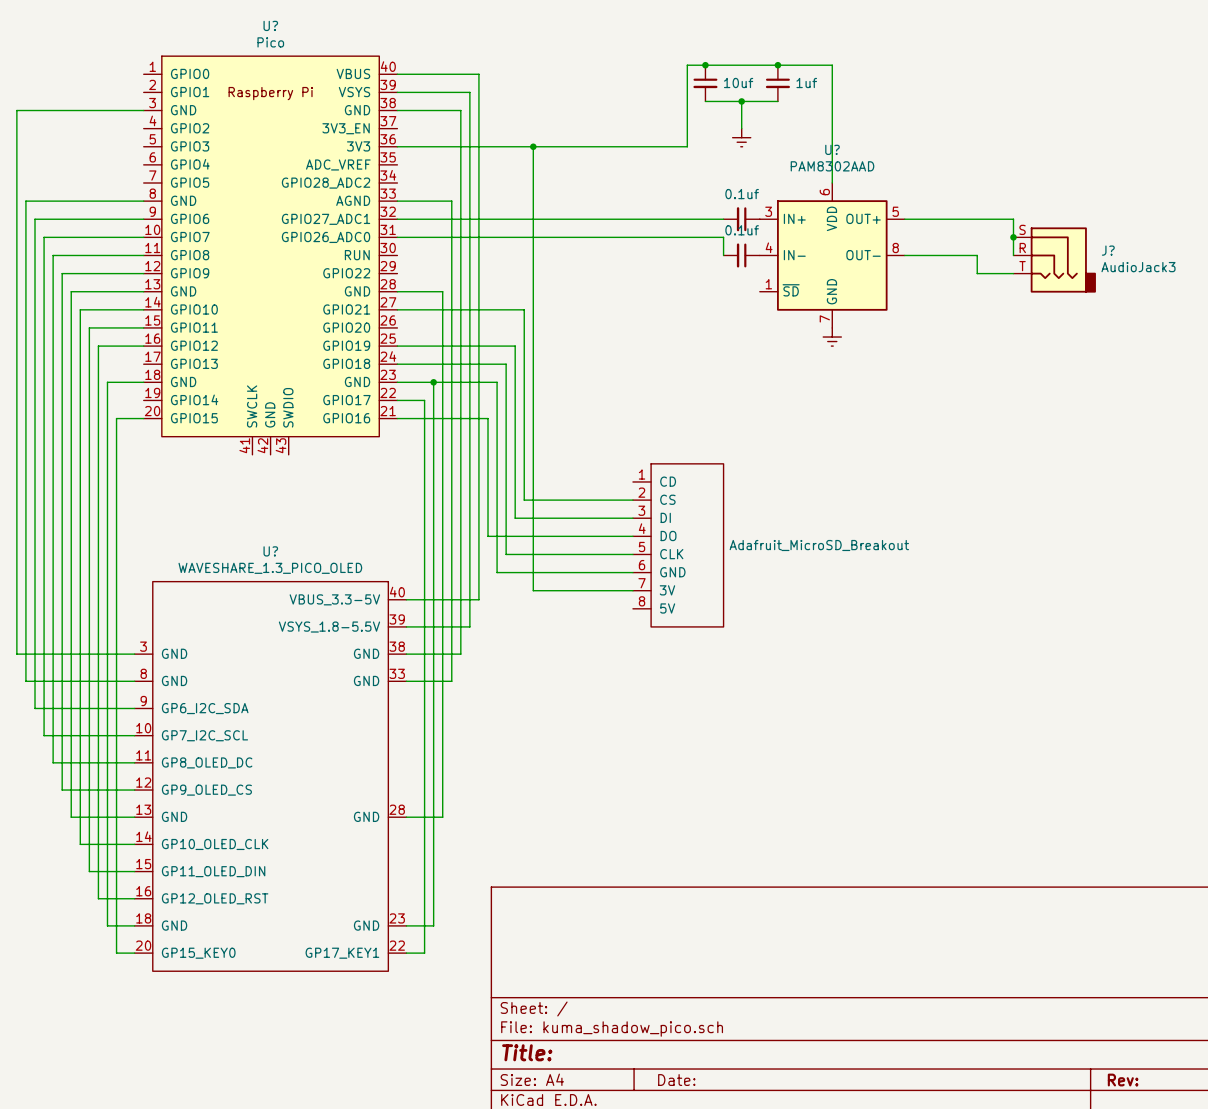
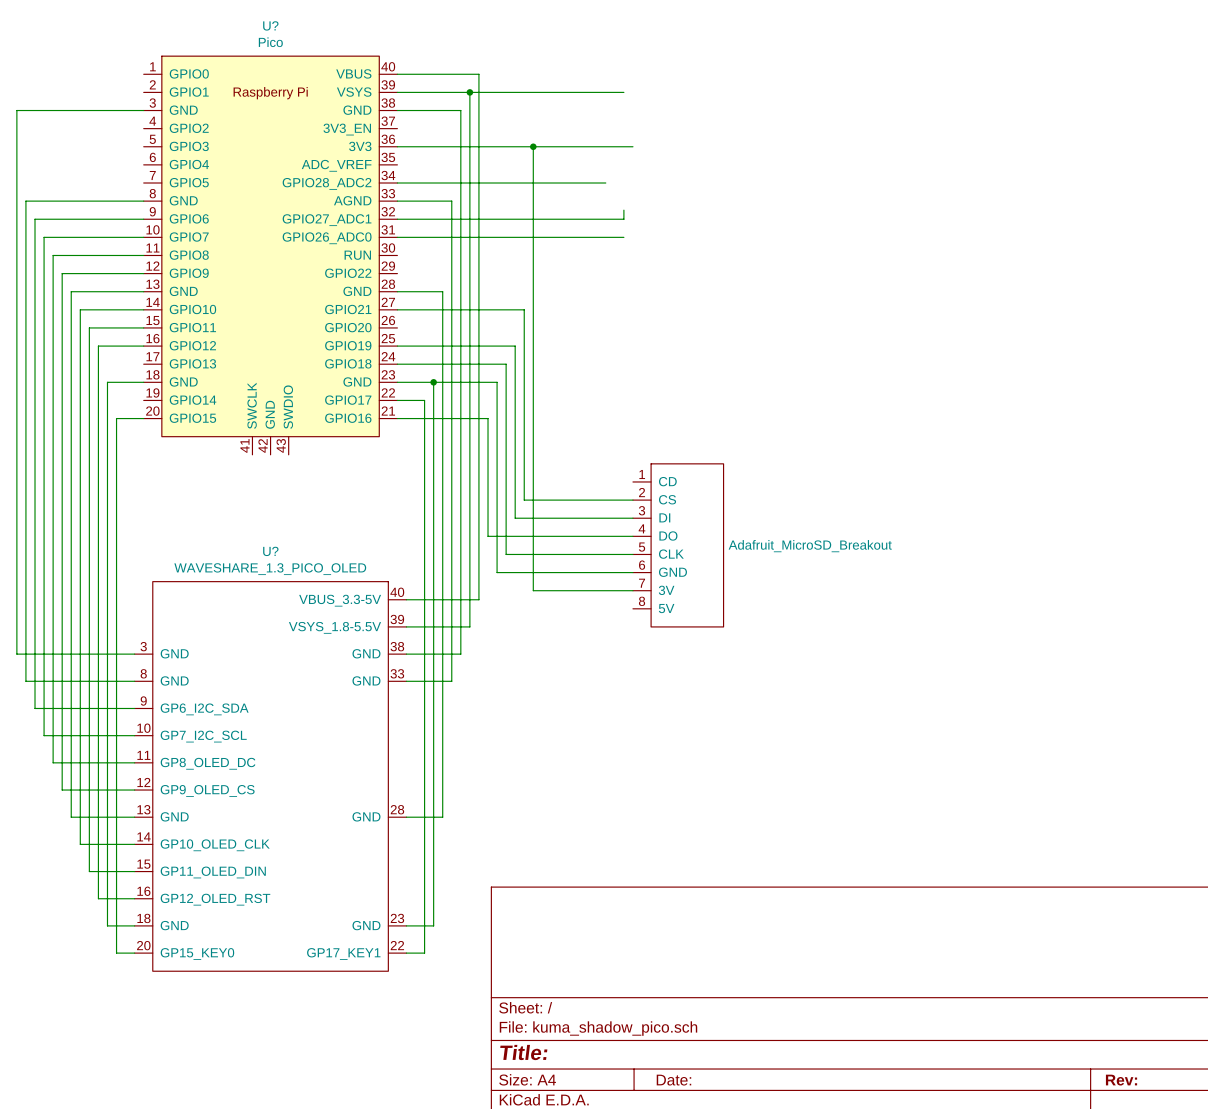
junction: (705, 65) -> none
junction: (777, 65) -> none
part: 10uf (705, 83) -> none
part: 1uf (777, 83) -> none
wire: none -> (469, 92) (623, 92)
junction: none -> (469, 92)
wire: (705, 101) (777, 101) -> none
wire: (741, 101) (741, 128) -> none
junction: (741, 101) -> none
power symbol: (741, 137) -> none
wire: (632, 146) (687, 146) (687, 65) (832, 65) (832, 183) -> none
wire: none -> (397, 183) (605, 183)
wire: (623, 219) (723, 219) -> (623, 219) (623, 210)
part: 0.1uf (741, 219) -> none
wire: (904, 219) (1013, 219) (1013, 255) -> none
wire: (623, 237) (723, 237) (723, 255) -> none
junction: (1013, 237) -> none
part: 0.1uf (741, 255) -> none
U?: PAM8302AAD (832, 255) -> none
wire: (904, 255) (977, 255) (977, 273) (1013, 273) -> none
J?: AudioJack3 (1054, 260) -> none
power symbol: (832, 337) -> none

